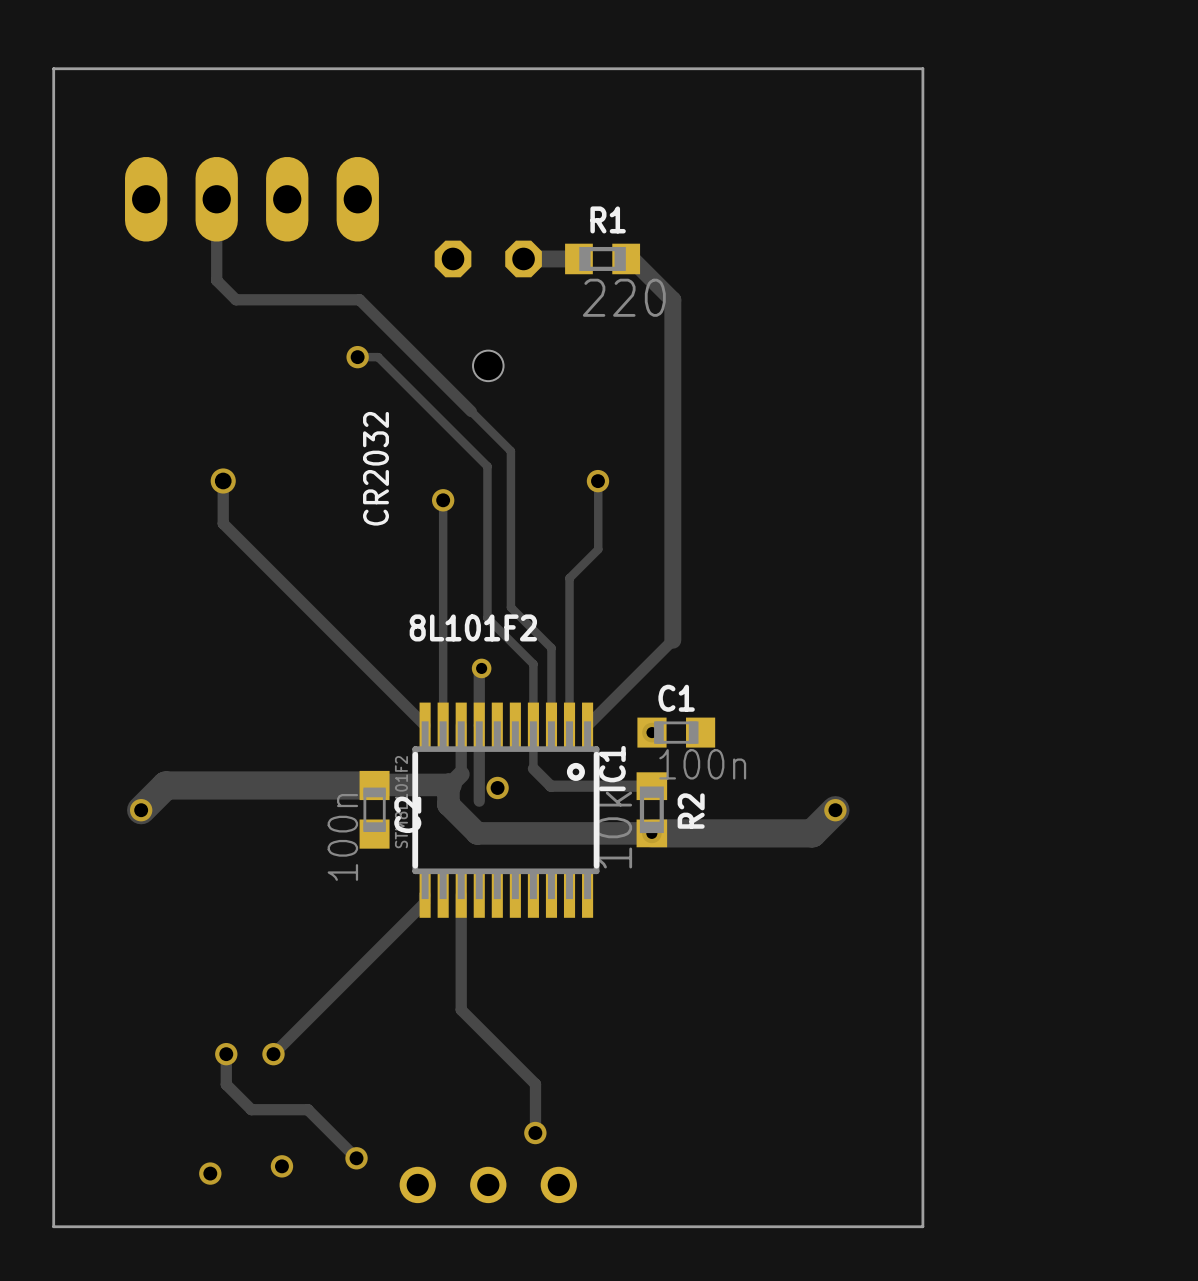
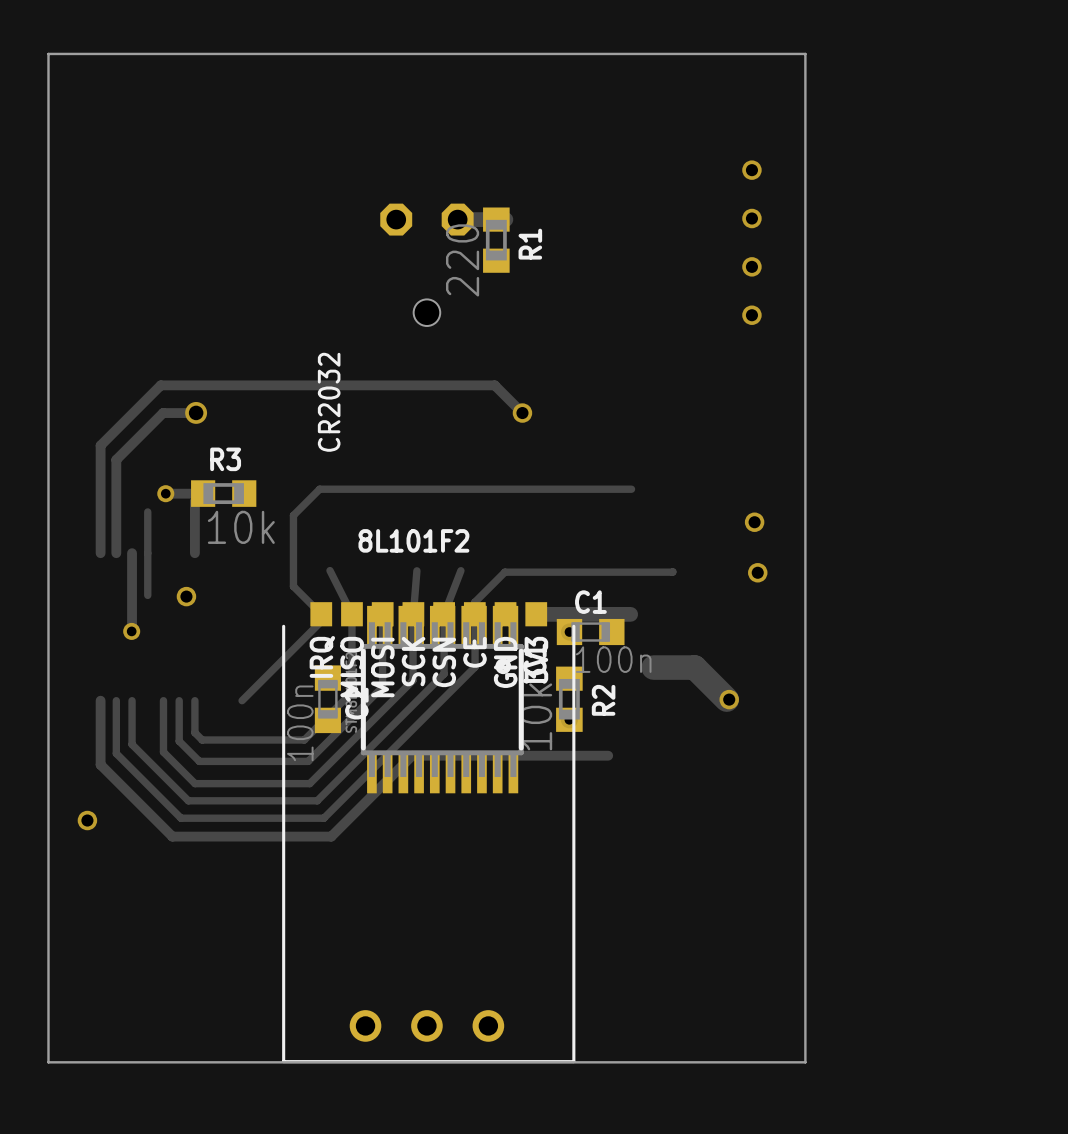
track: (216, 199) (216, 280) (236, 299) (359, 299) (510, 451) (510, 607) (551, 648) (551, 725) -> none
part: (251, 199) -> none
via: none -> (751, 170)
via: none -> (751, 218)
R1 rotation: 0° (602, 258) -> 90° clockwise (496, 240)
track: (626, 258) (631, 258) (672, 299) (672, 640) (587, 725) -> none
via: none -> (751, 266)
track: (357, 357) (378, 357) (487, 466) (487, 618) (533, 664) (533, 768) -> none
via: (357, 357) -> none
via: none -> (751, 315)
track: (223, 480) (223, 523) (425, 725) -> (196, 413) (163, 413) (116, 459) (116, 553)
track: (598, 481) (598, 549) (569, 578) (569, 725) -> (522, 413) (494, 385) (160, 385) (100, 445) (100, 553)
track: (443, 500) (443, 725) -> none
via: (443, 500) -> none
track: none -> (631, 489) (319, 489) (293, 515) (293, 586) (321, 614) (321, 621) (242, 700)
track: none -> (165, 493) (203, 493) (194, 501) (194, 553)
via: none -> (165, 493)
R3: none -> 10k (223, 493)
track: none -> (147, 511) (147, 595)
via: none -> (754, 522)
track: none -> (132, 553) (131, 631)
track: none -> (329, 570) (351, 614) (351, 692) (304, 739) (202, 739) (194, 732) (194, 700)
track: none -> (416, 570) (413, 614) (413, 680) (309, 783) (195, 783) (163, 752) (163, 700)
track: none -> (460, 570) (444, 614) (444, 673) (317, 800) (188, 800) (132, 744) (132, 700)
track: none -> (672, 571) (504, 572) (474, 602) (474, 614)
via: none -> (757, 572)
track: (479, 666) (479, 801) -> none
via: (481, 668) -> none
via: none -> (186, 596)
track: none -> (382, 614) (382, 687) (308, 761) (199, 761) (179, 741) (179, 700)
track: none -> (475, 614) (475, 667) (323, 818) (181, 818) (116, 753) (116, 700)
track: none -> (630, 614) (536, 614)
track: (461, 725) (461, 774) (450, 784) (165, 785) (141, 810) -> none
via: none -> (131, 631)
track: (533, 768) (550, 786) (651, 786) -> none
track: none -> (653, 667) (694, 667) (726, 699)
track: (448, 784) (448, 804) (477, 833) (812, 833) (835, 810) -> none
via: (497, 787) -> none
via: (141, 810) -> none
track: none -> (100, 700) (100, 764) (172, 836) (331, 836) (412, 755) (608, 755)
track: (425, 894) (424, 903) (273, 1054) -> none
track: (461, 894) (461, 1009) (535, 1084) (535, 1132) -> none
via: none -> (87, 820)
part: none -> (428, 832)
track: (226, 1054) (226, 1084) (251, 1109) (307, 1109) (356, 1158) -> none
via: (226, 1054) -> none
via: (273, 1054) -> none
via: (535, 1133) -> none
via: (356, 1158) -> none
via: (281, 1166) -> none
via: (210, 1173) -> none

